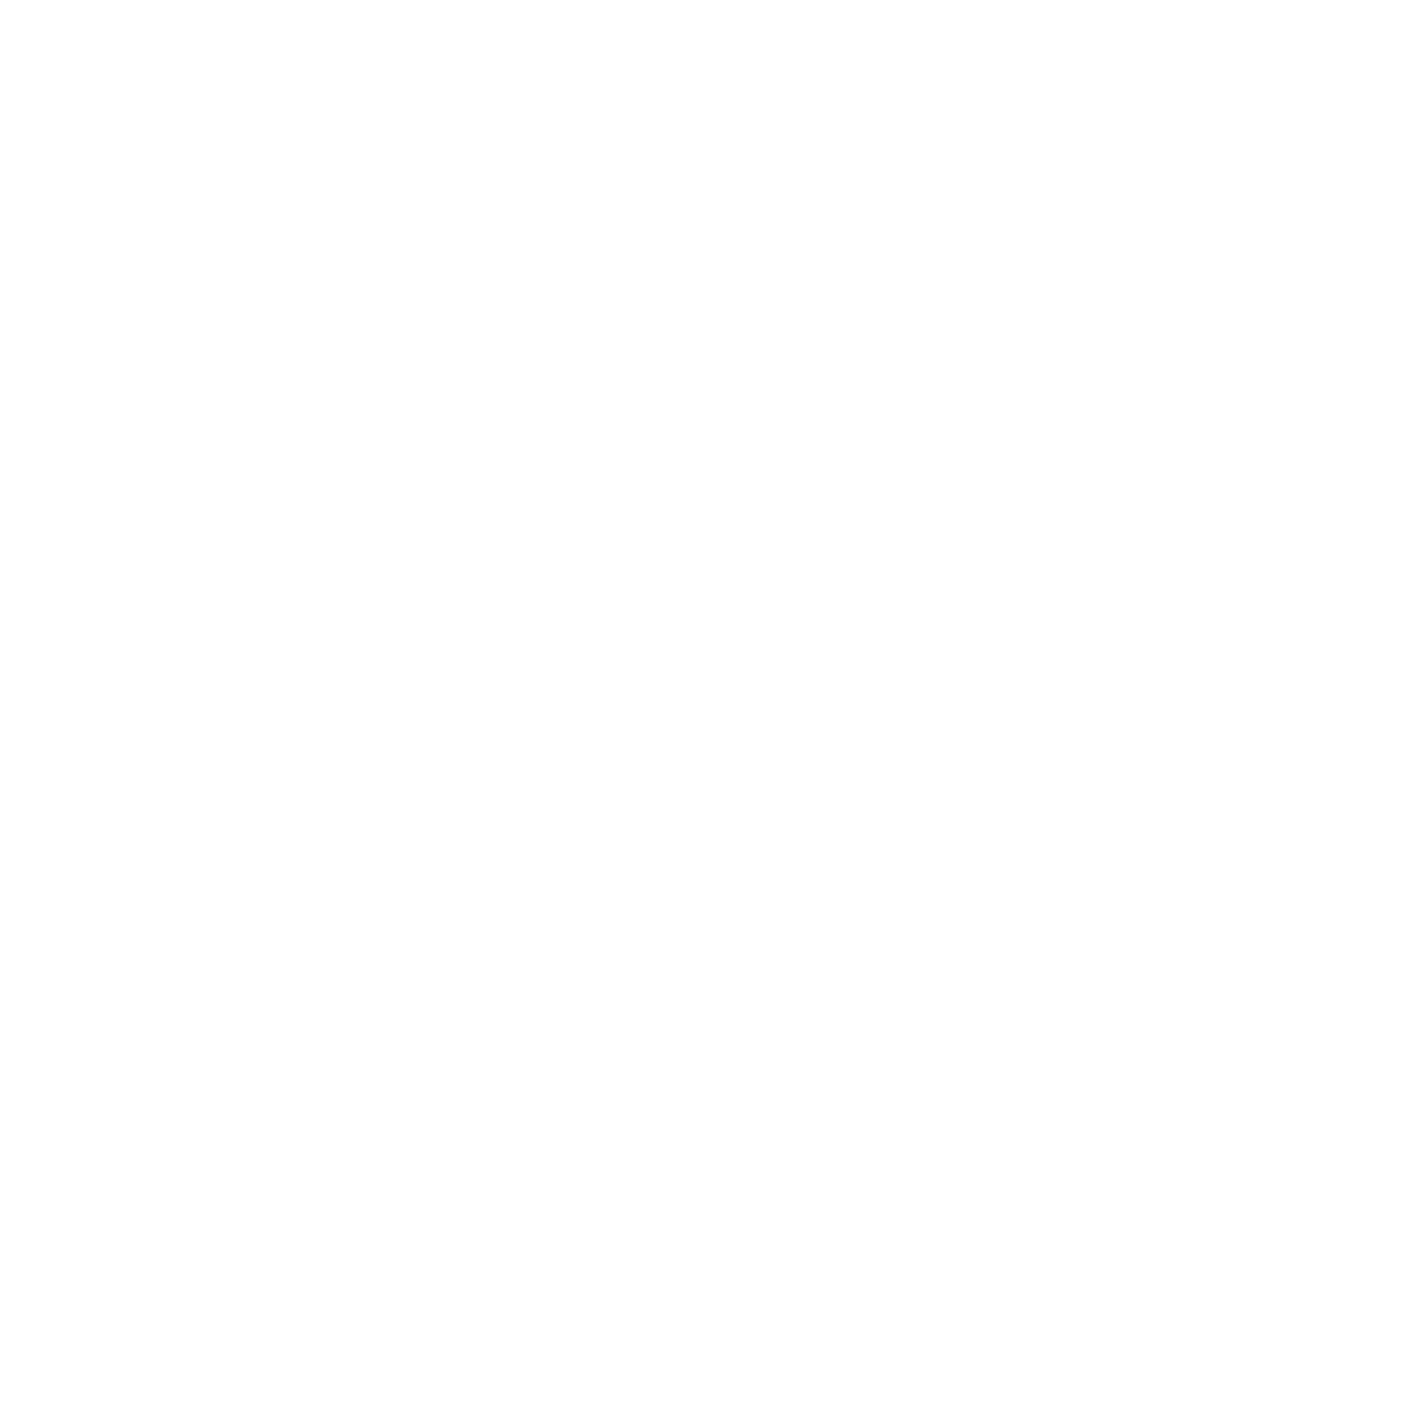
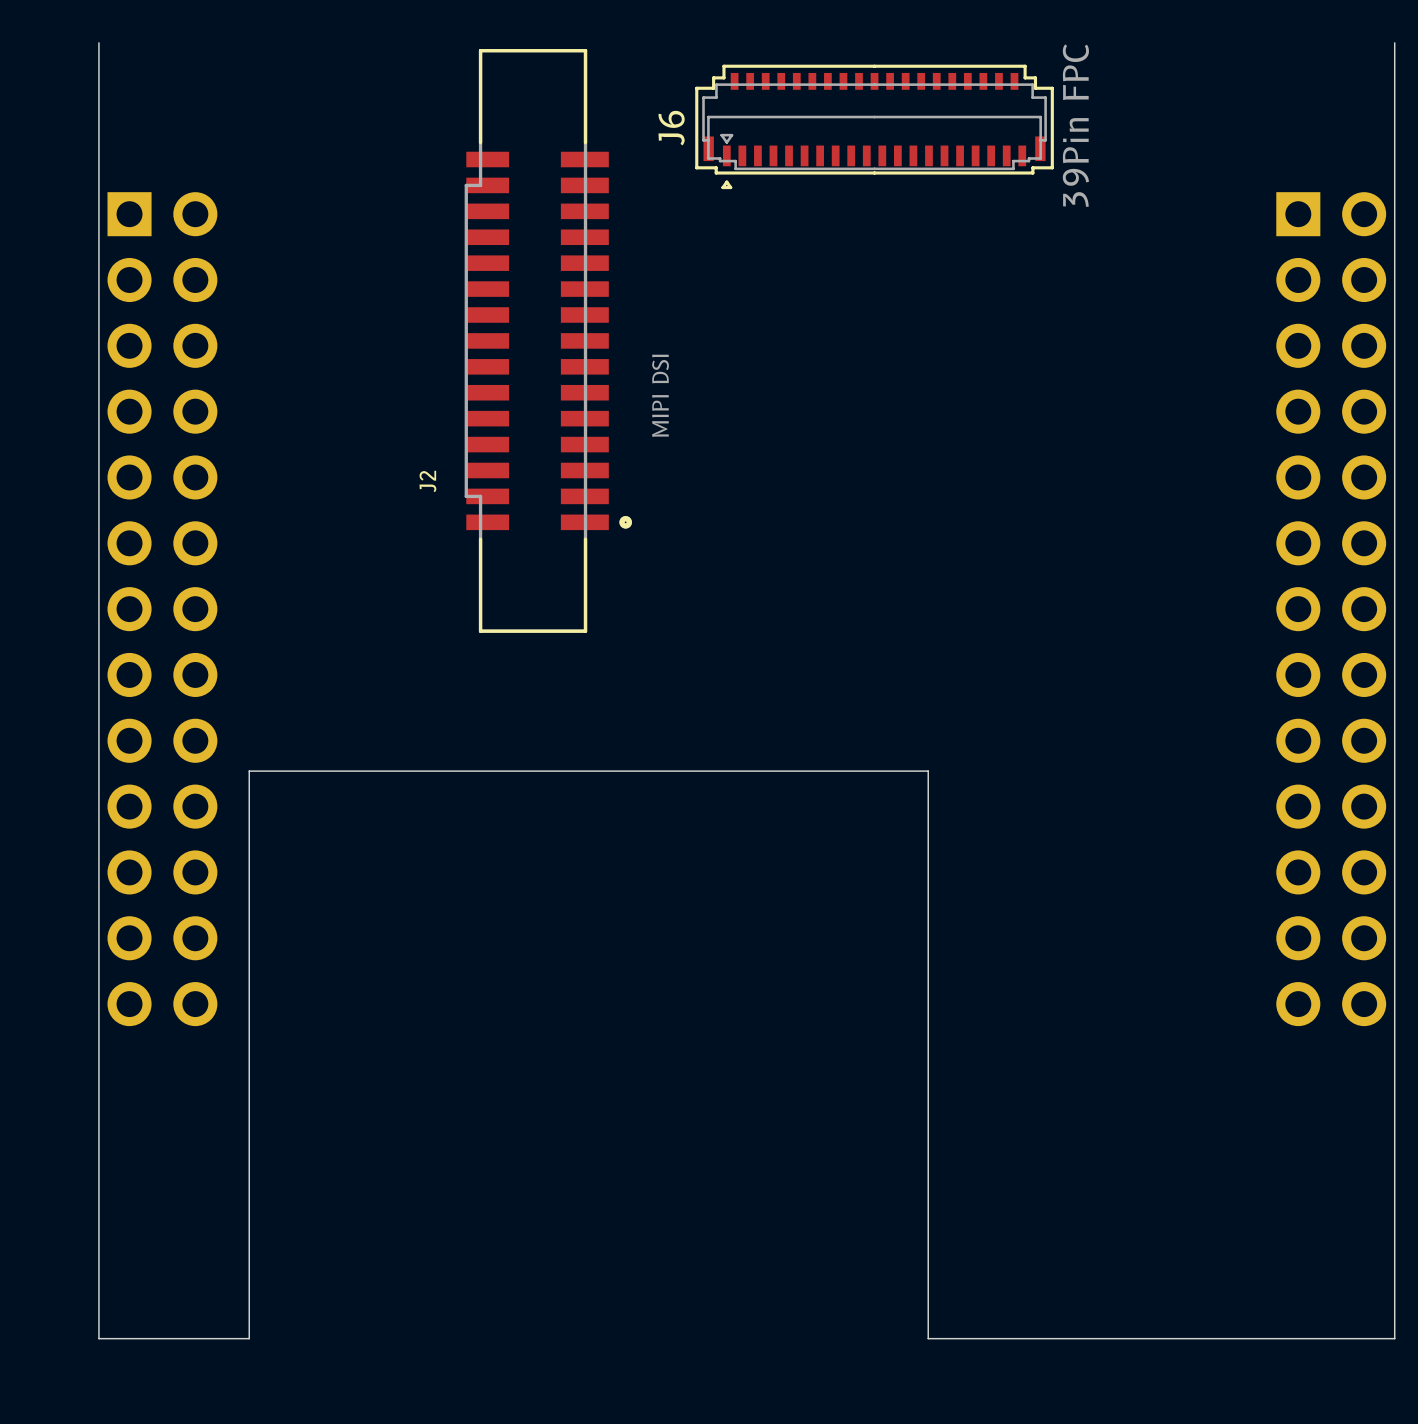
board edge: none -> (98, 42) (98, 1338) (249, 1338) (249, 771) (928, 771) (928, 1338) (1394, 1338) (1394, 42)
J6: none -> 39Pin FPC (874, 126)
J2: none -> MIPI DSI (548, 340)
part: none -> (162, 609)
part: none -> (1331, 609)

